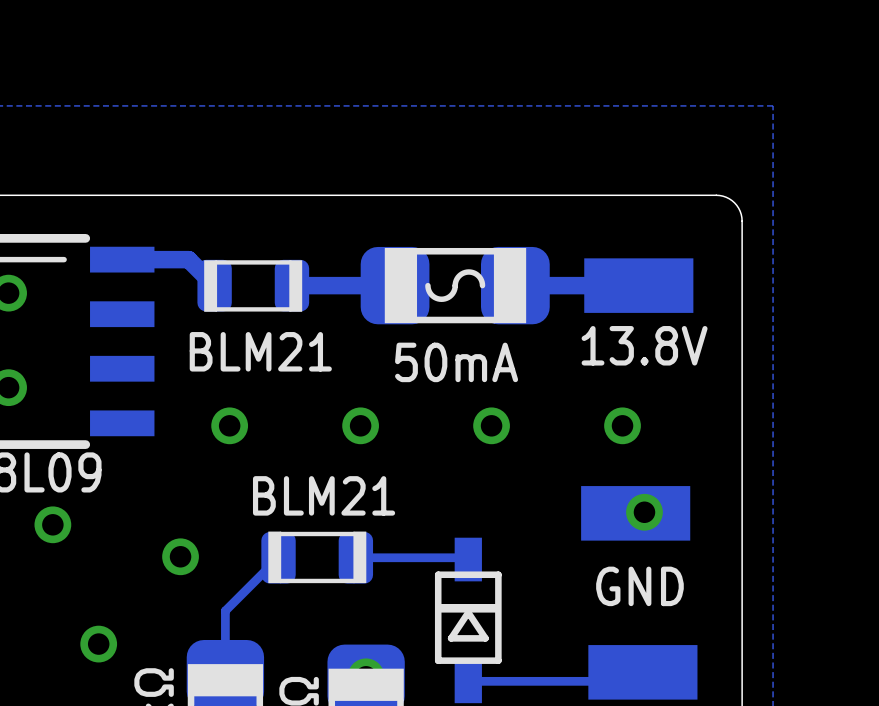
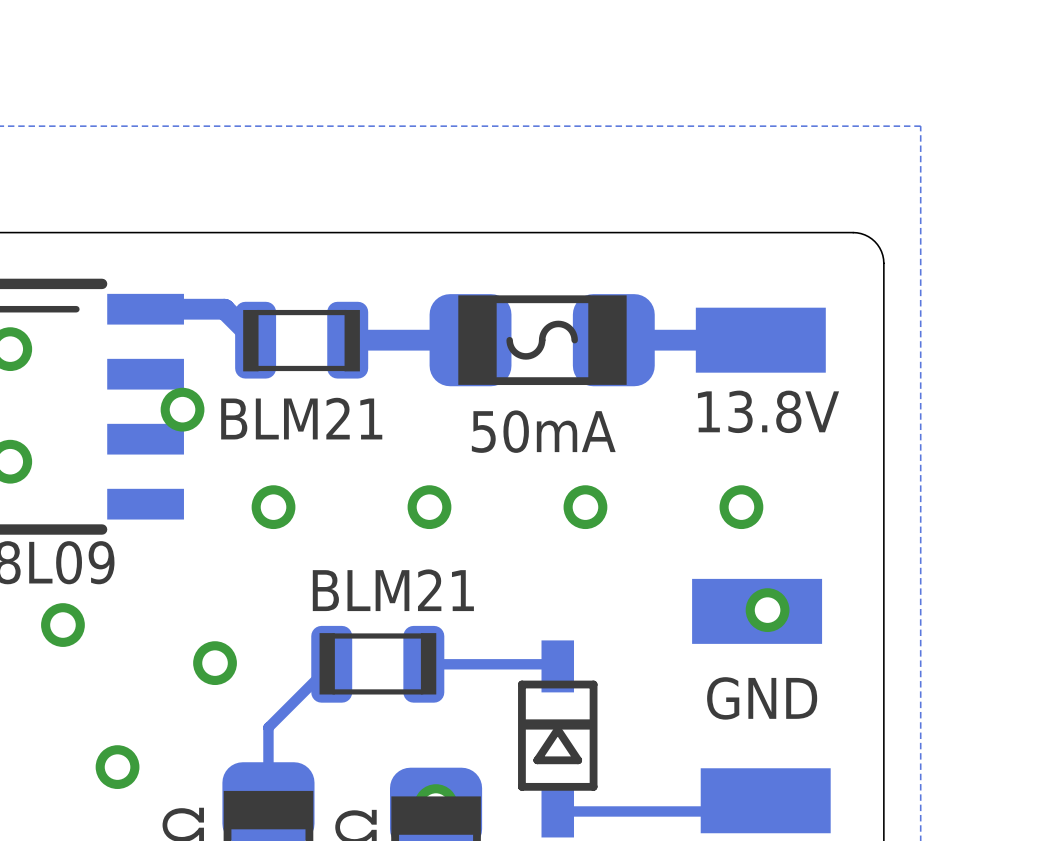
part footprint: [197, 259, 310, 312] -> [235, 301, 369, 379]
via: none -> (182, 409)
part footprint: [261, 531, 374, 584] -> [311, 625, 445, 703]

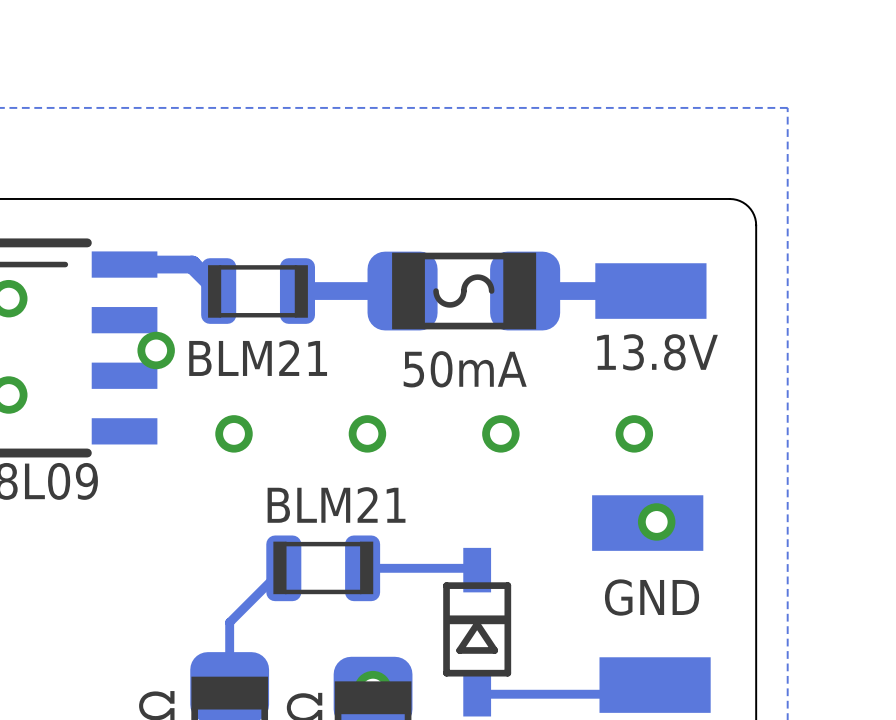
via: (62, 625) -> none
via: (215, 663) -> none
via: (117, 767) -> none

